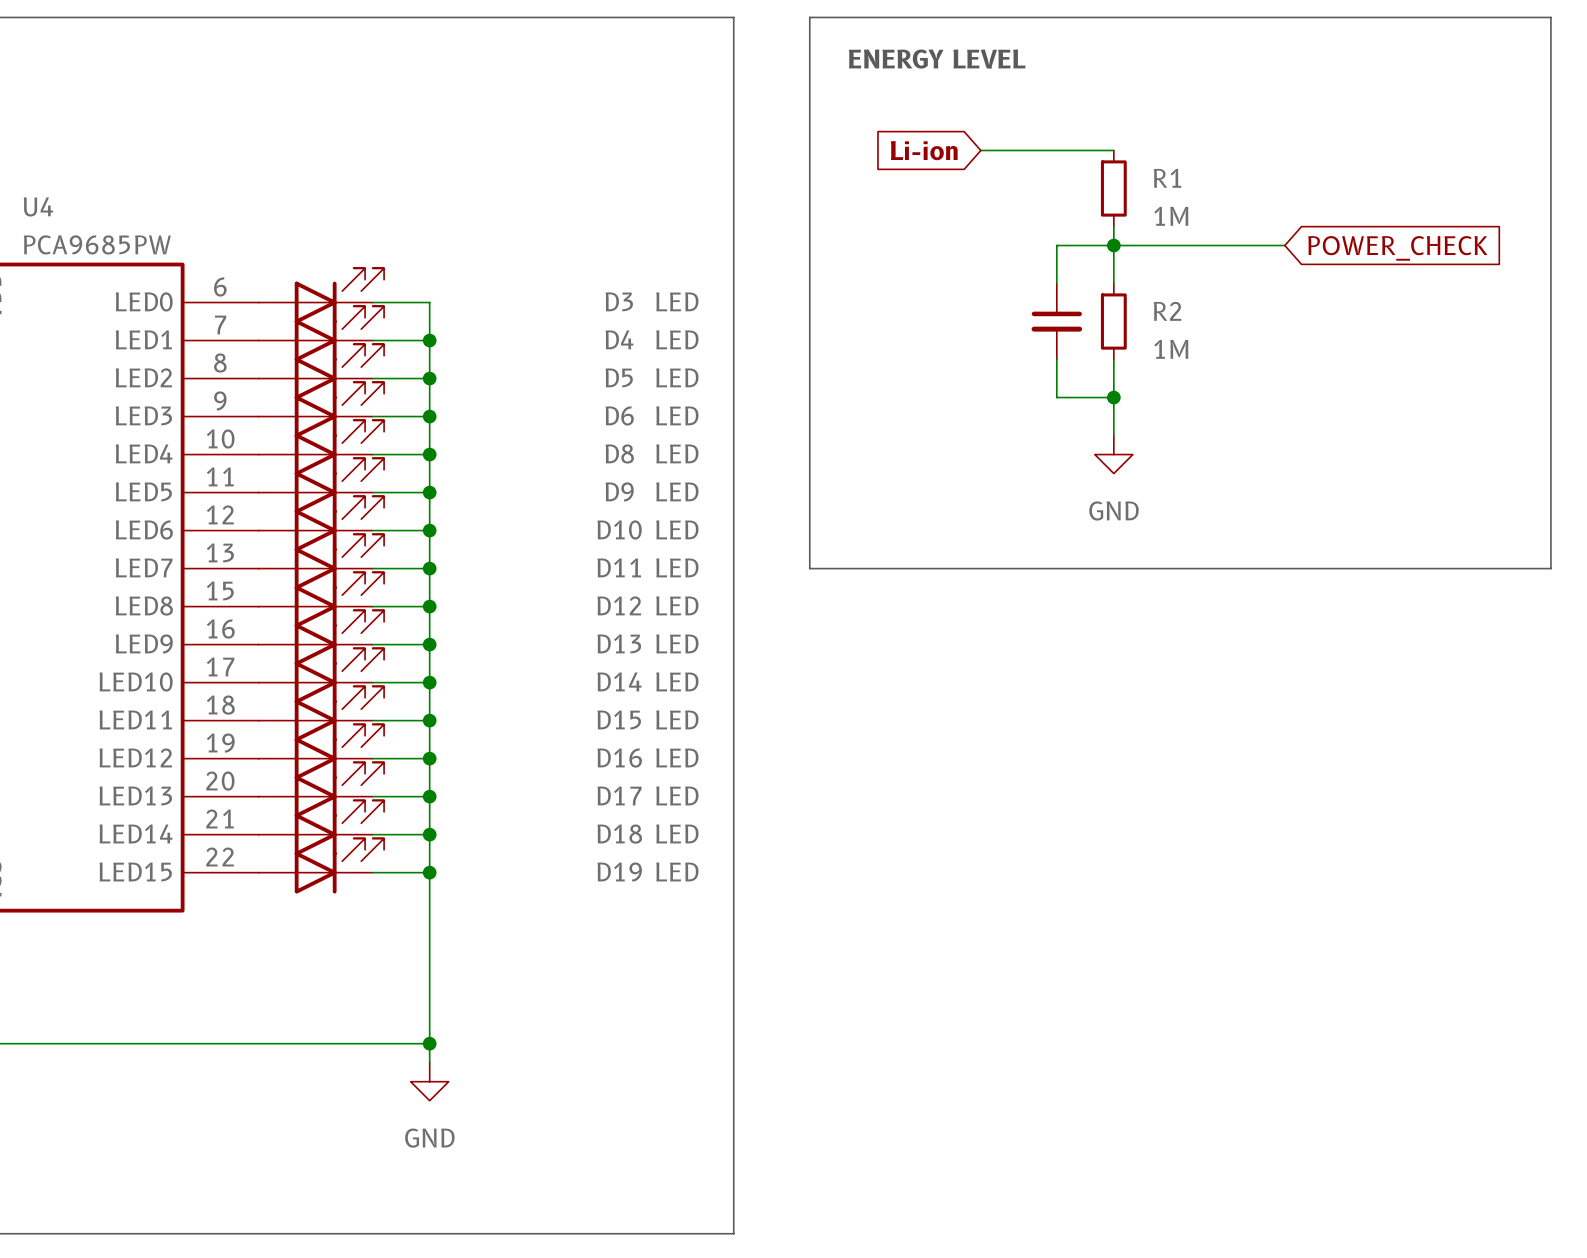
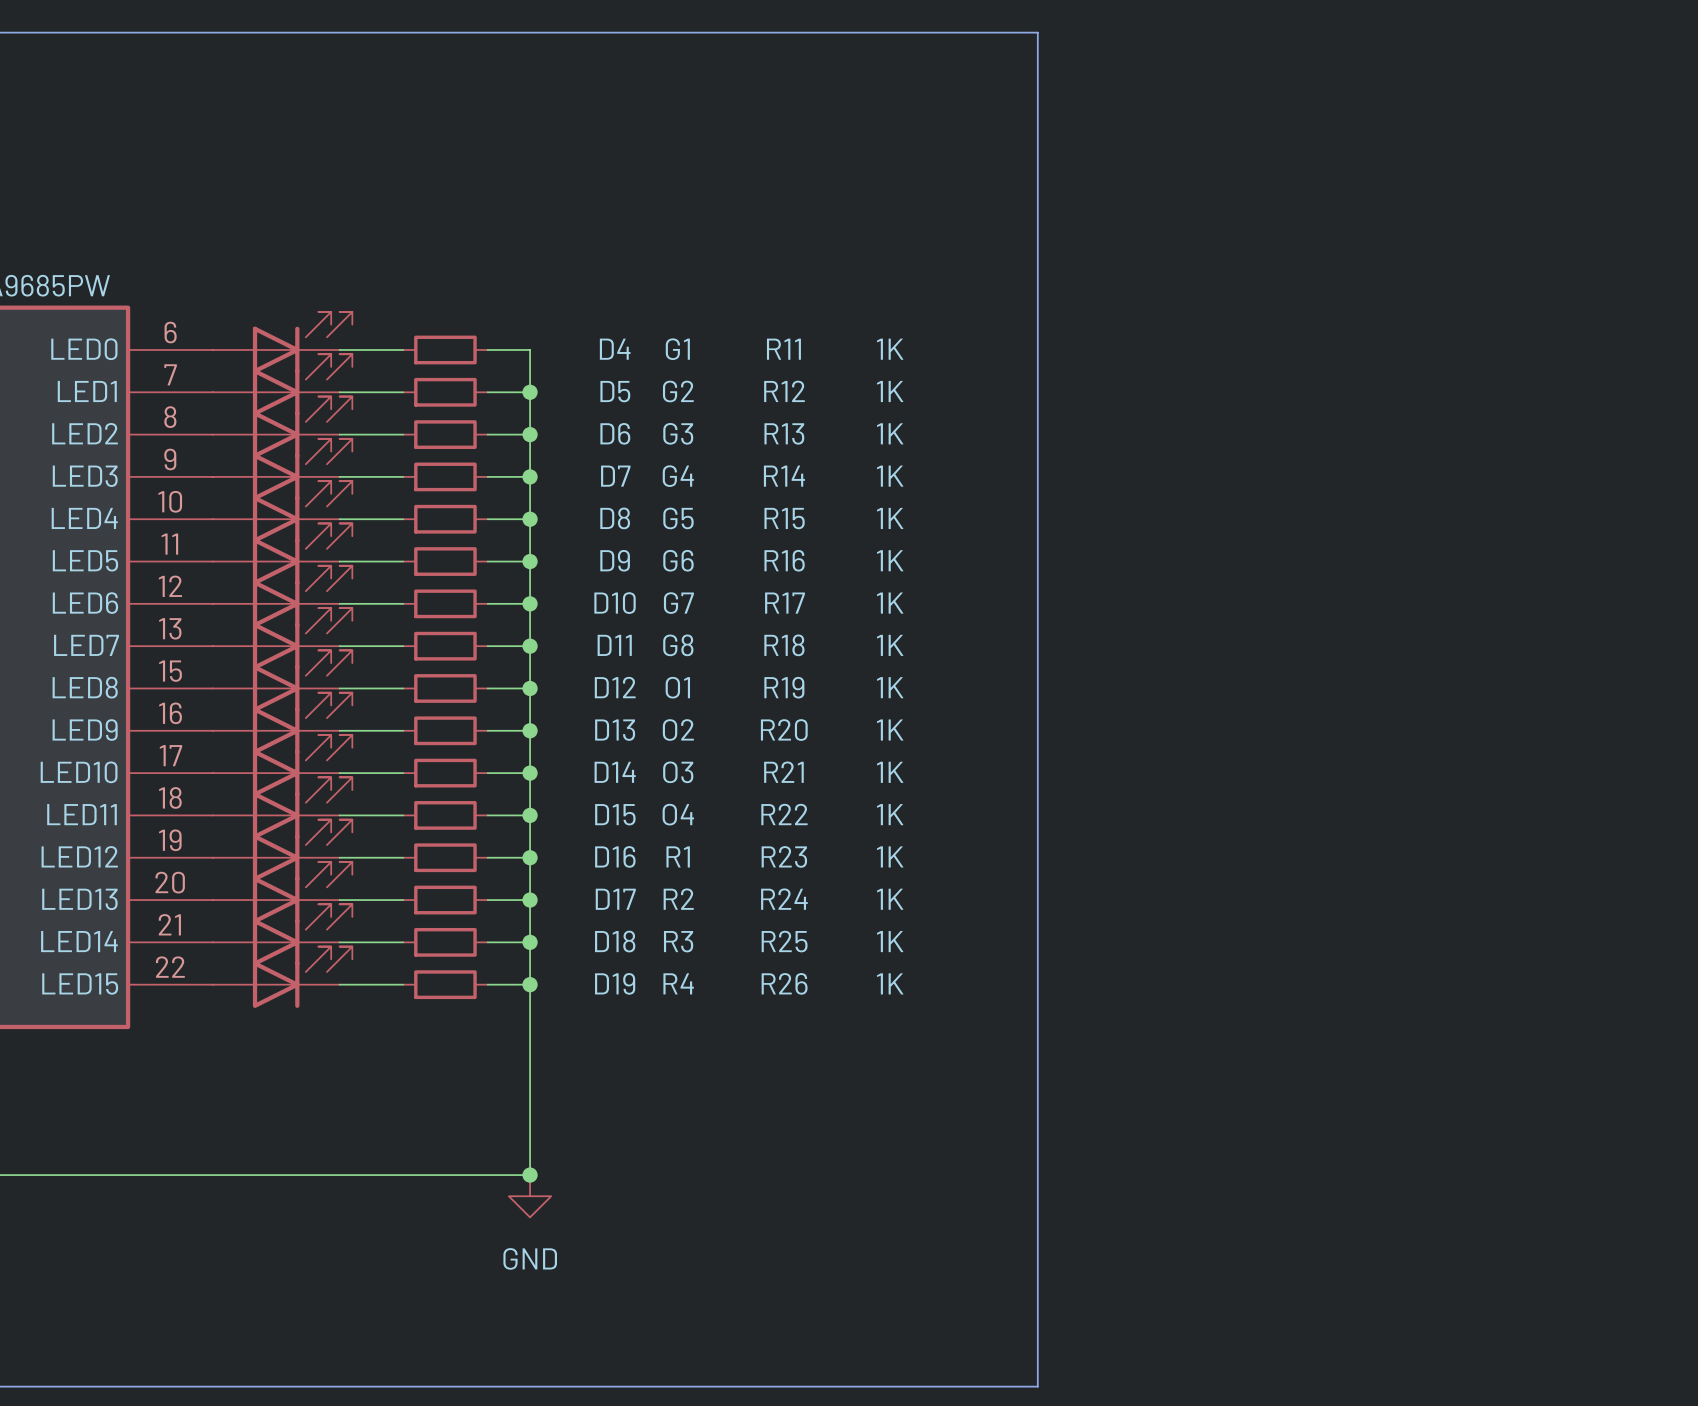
line: (733, 17) (733, 1233) -> (1037, 32) (1037, 1386) (741, 1386)
line: (809, 17) (809, 568) (1550, 568) (1550, 17) (999, 17) -> (826, 32) (741, 32)
text: ENERGY LEVEL (937, 59) -> none
global label: Li-ion (924, 150) -> none
wire: (980, 150) (1113, 150) -> none
R1: 1M (1113, 188) -> none
wire: (1113, 226) (1113, 283) -> none
junction: (1113, 245) -> none
wire: (1284, 245) (1056, 245) (1056, 283) -> none
global label: POWER_CHECK (1397, 248) -> none
D3 name: D3 (619, 301) -> D4 (615, 349)
D3 value: LED (677, 301) -> G1 (677, 349)
wire: (429, 302) (429, 1062) -> none
R11: none -> 1K (445, 349)
wire: none -> (487, 349) (530, 349) (530, 1175) (403, 1175)
part: (1056, 321) -> none
R2: 1M (1113, 321) -> none
D4 name: D4 (619, 339) -> D5 (615, 391)
D4 value: LED (677, 339) -> G2 (678, 391)
junction: (429, 340) -> none
R12: none -> 1K (445, 392)
wire: none -> (487, 392) (530, 392)
junction: none -> (530, 392)
wire: (1056, 359) (1056, 397) (1113, 397) -> none
wire: (1113, 359) (1113, 435) -> none
D5 name: D5 (619, 377) -> D6 (615, 433)
D5 value: LED (677, 377) -> G3 (678, 433)
junction: (429, 378) -> none
R13: none -> 1K (445, 434)
wire: none -> (487, 434) (530, 434)
junction: none -> (530, 434)
junction: (1113, 397) -> none
D6 name: D6 (619, 415) -> D7 (615, 476)
D6 value: LED (677, 415) -> G4 (678, 476)
junction: (429, 416) -> none
R14: none -> 1K (445, 476)
wire: none -> (487, 476) (530, 476)
junction: none -> (530, 476)
D8 value: LED (677, 453) -> G5 (678, 518)
junction: (429, 454) -> none
R15: none -> 1K (445, 519)
wire: none -> (487, 519) (530, 519)
junction: none -> (530, 519)
power symbol: GND (1113, 454) -> none
D9 value: LED (677, 491) -> G6 (678, 560)
junction: (429, 492) -> none
R16: none -> 1K (445, 561)
wire: none -> (487, 561) (530, 561)
junction: none -> (530, 561)
D10 value: LED (677, 529) -> G7 (678, 603)
junction: (429, 530) -> none
R17: none -> 1K (445, 603)
wire: none -> (487, 603) (530, 603)
junction: none -> (530, 603)
D11 value: LED (677, 567) -> G8 (678, 645)
junction: (429, 568) -> none
R18: none -> 1K (445, 646)
wire: none -> (487, 646) (530, 646)
junction: none -> (530, 646)
D12 value: LED (677, 605) -> O1 (677, 687)
junction: (429, 606) -> none
R19: none -> 1K (445, 688)
wire: none -> (487, 688) (530, 688)
junction: none -> (530, 688)
D13 value: LED (677, 643) -> O2 (678, 730)
junction: (429, 644) -> none
R20: none -> 1K (445, 730)
wire: none -> (487, 730) (530, 730)
junction: none -> (530, 730)
D14 value: LED (677, 681) -> O3 (678, 772)
junction: (429, 682) -> none
R21: none -> 1K (445, 773)
wire: none -> (487, 773) (530, 773)
junction: none -> (530, 773)
D15 value: LED (677, 719) -> O4 (678, 814)
junction: (429, 720) -> none
R22: none -> 1K (445, 815)
wire: none -> (487, 815) (530, 815)
junction: none -> (530, 815)
D16 value: LED (677, 757) -> R1 (678, 856)
junction: (429, 758) -> none
R23: none -> 1K (445, 857)
wire: none -> (487, 857) (530, 857)
junction: none -> (530, 857)
D17 value: LED (677, 795) -> R2 (678, 899)
junction: (429, 796) -> none
R24: none -> 1K (445, 900)
wire: none -> (487, 900) (530, 900)
junction: none -> (530, 900)
D18 value: LED (677, 833) -> R3 (678, 941)
junction: (429, 834) -> none
R25: none -> 1K (445, 942)
wire: none -> (487, 942) (530, 942)
junction: none -> (530, 942)
D19 value: LED (677, 871) -> R4 (678, 983)
junction: (429, 872) -> none
R26: none -> 1K (445, 984)
wire: none -> (487, 984) (530, 984)
junction: none -> (530, 984)
junction: (429, 1043) -> none
junction: none -> (530, 1175)
power symbol position: GND (429, 1081) -> GND (530, 1196)

